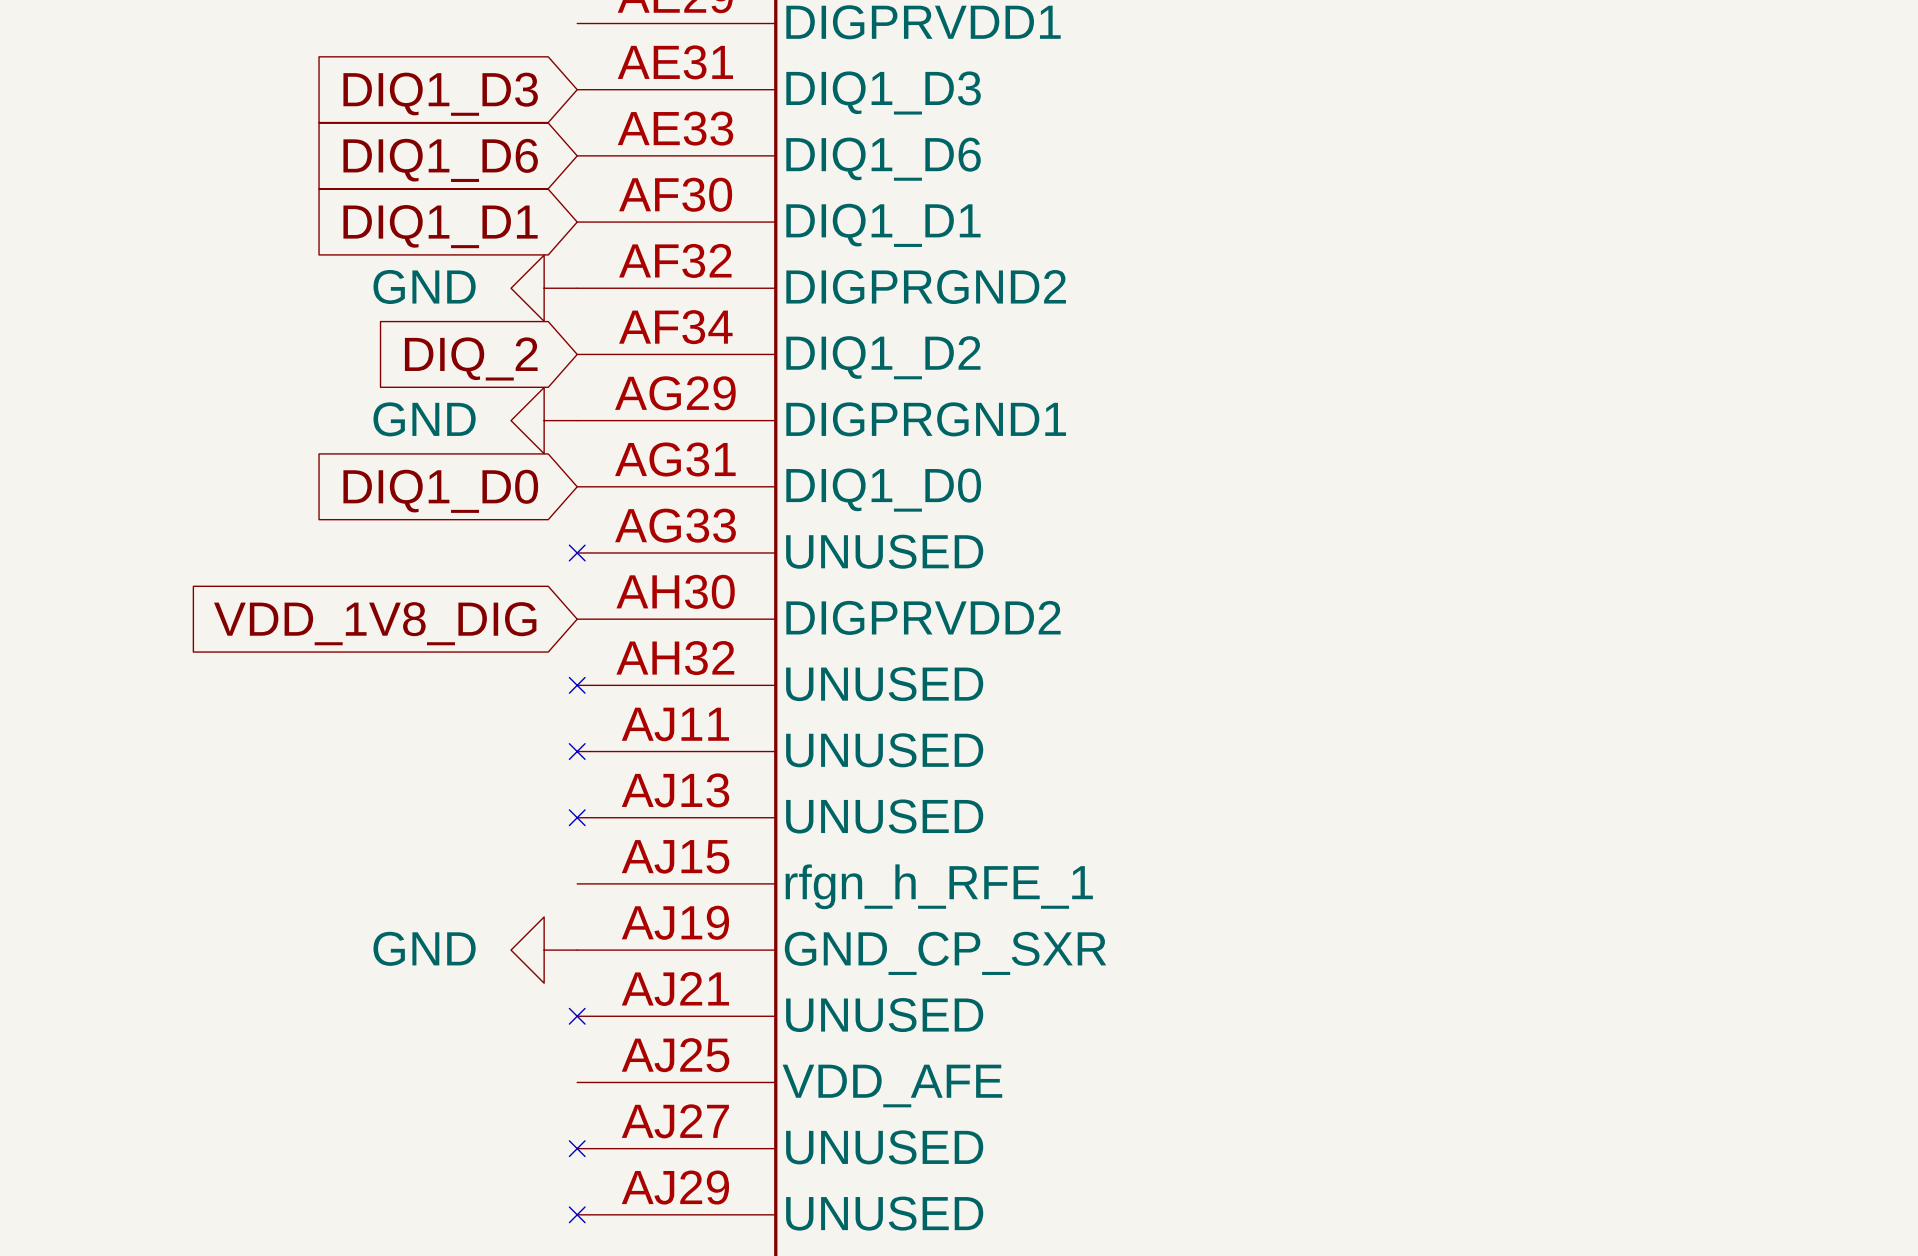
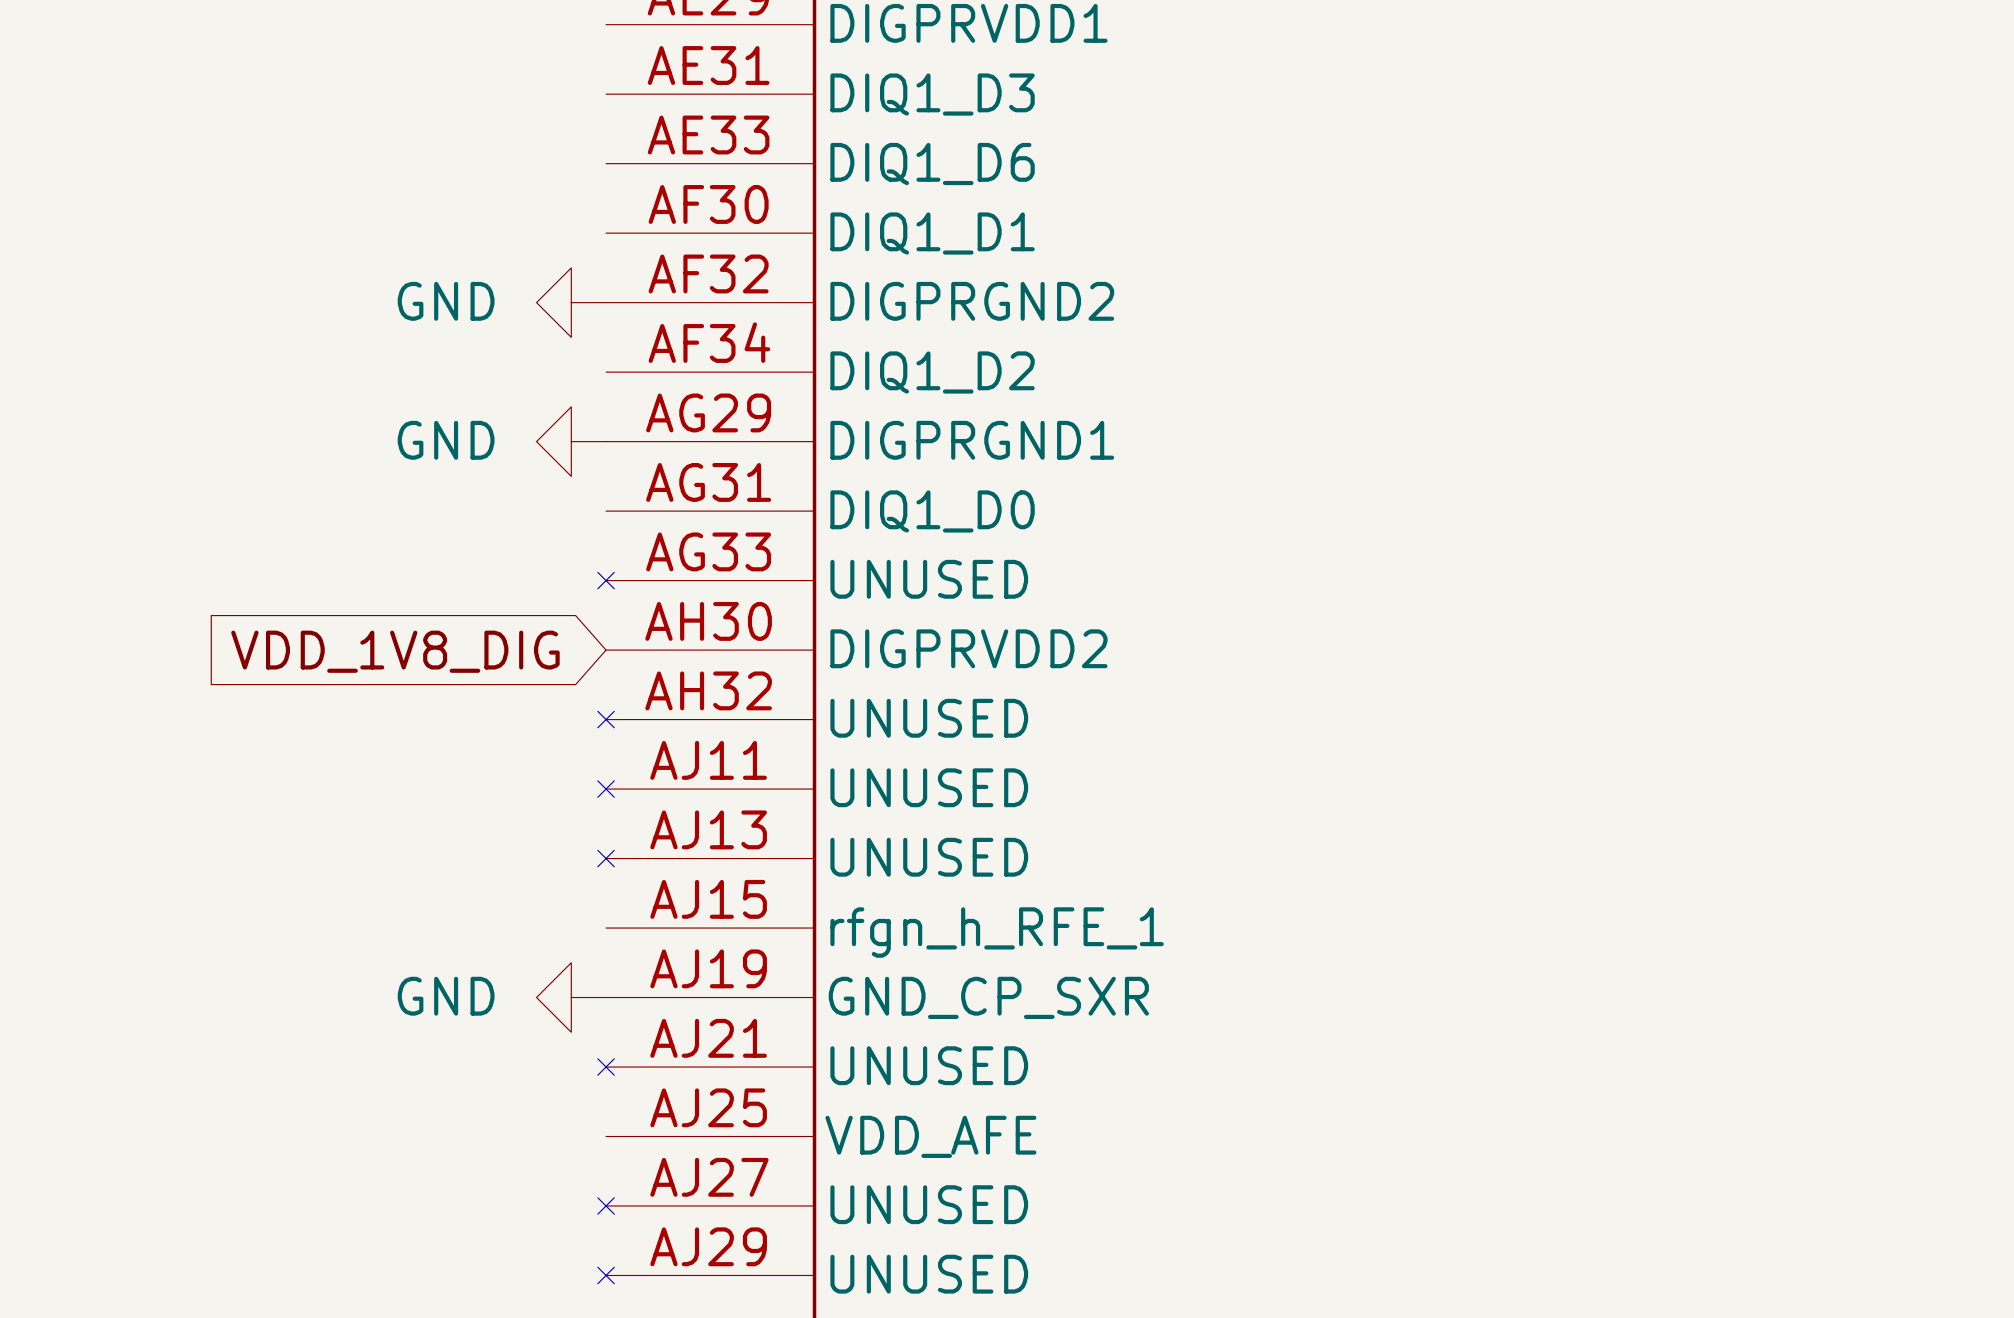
global label: DIQ1_D3 (440, 94) -> none
global label: DIQ1_D6 (440, 160) -> none
global label: DIQ1_D1 (440, 226) -> none
global label: DIQ_2 (471, 358) -> none
global label: DIQ1_D0 (440, 491) -> none

